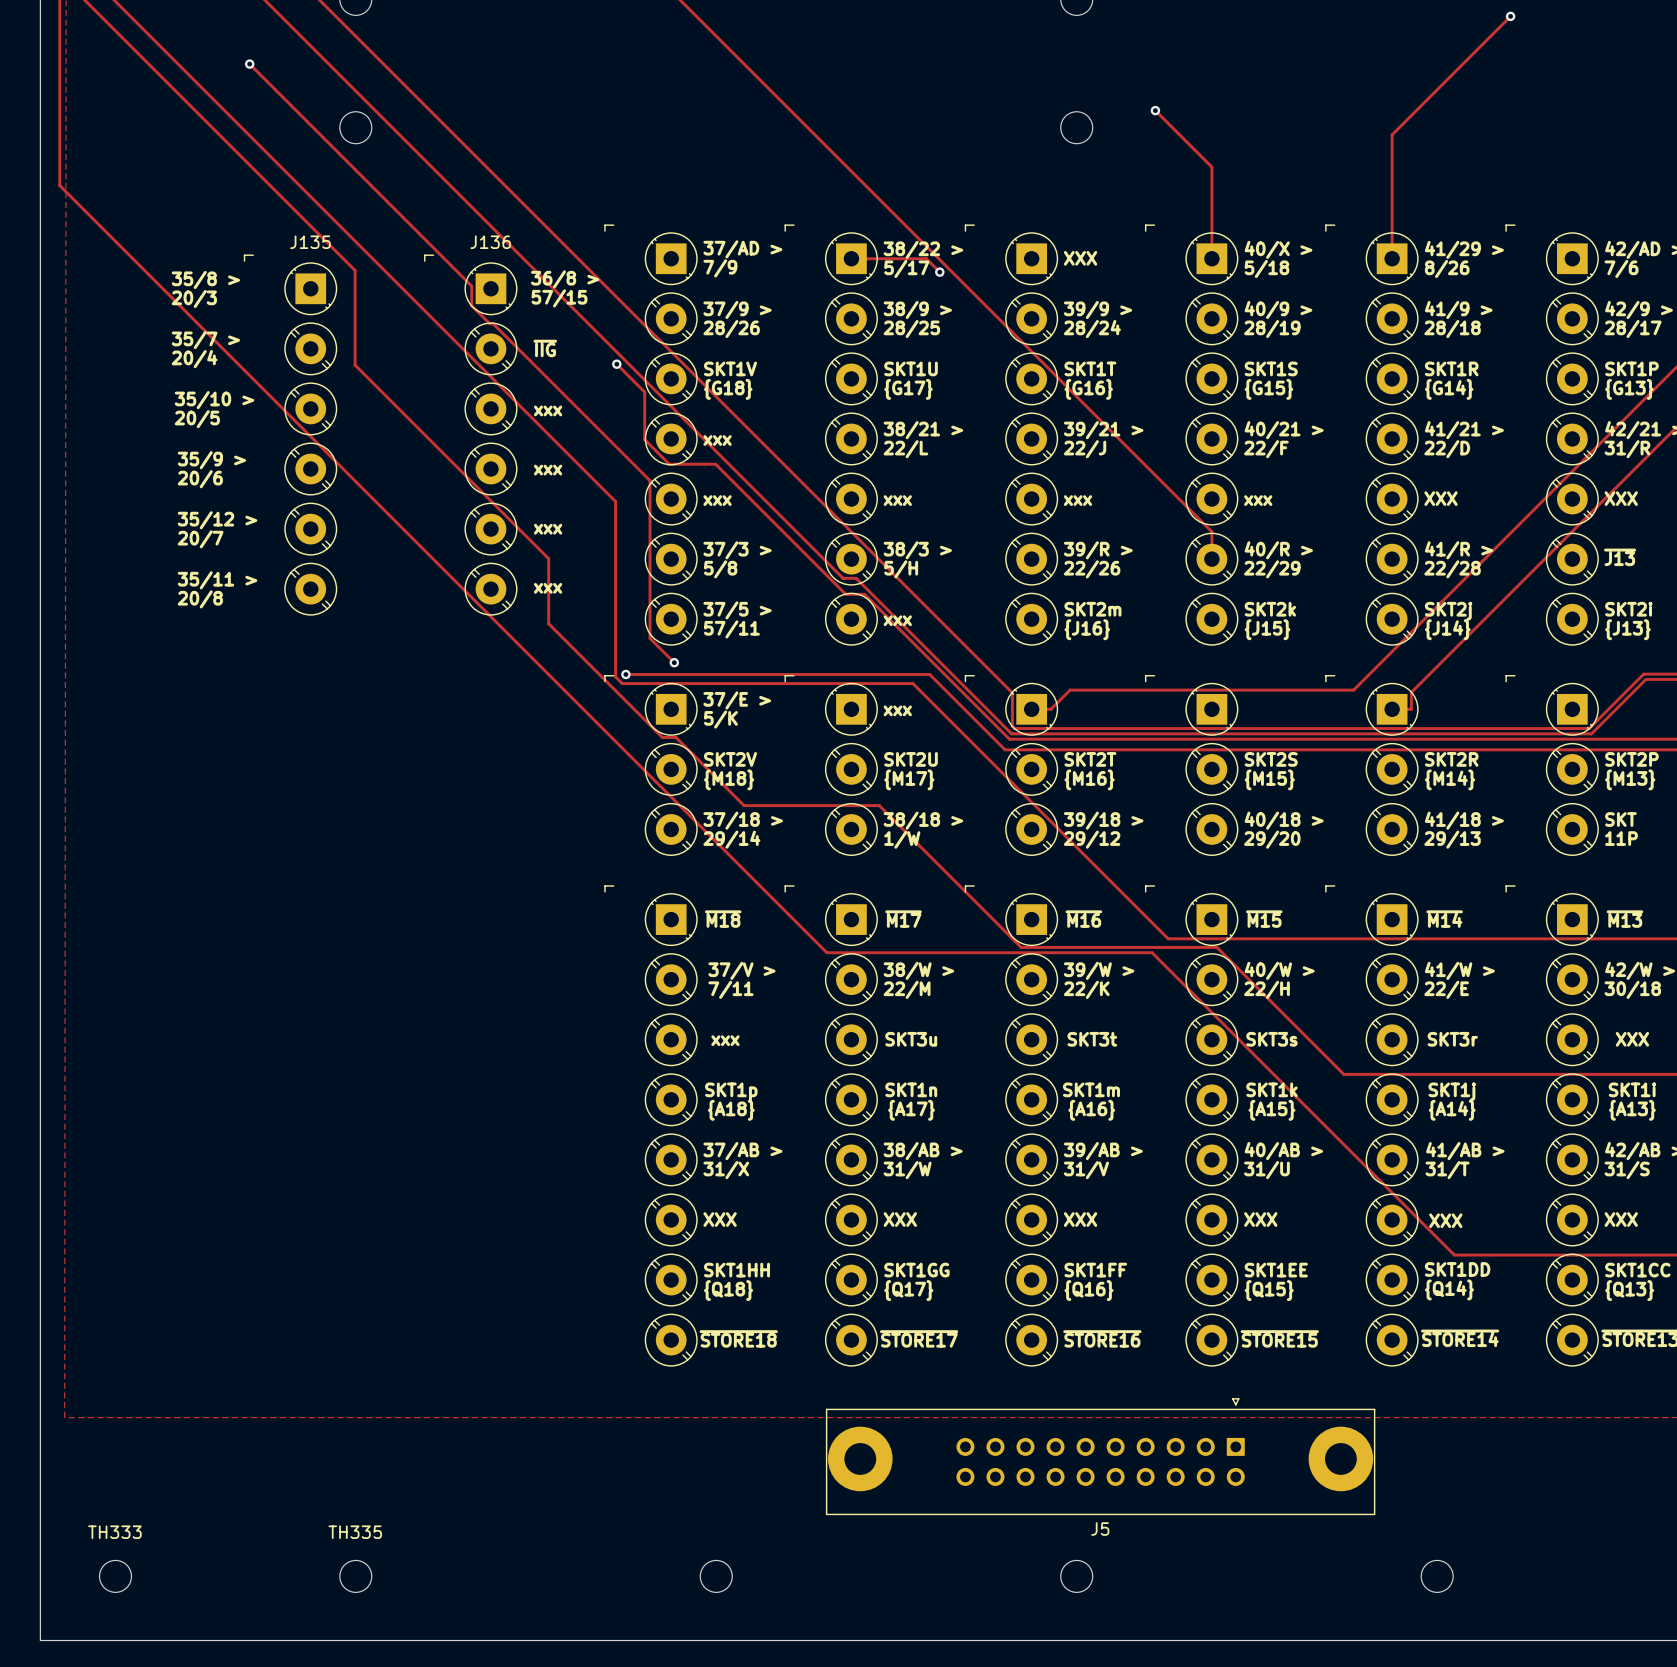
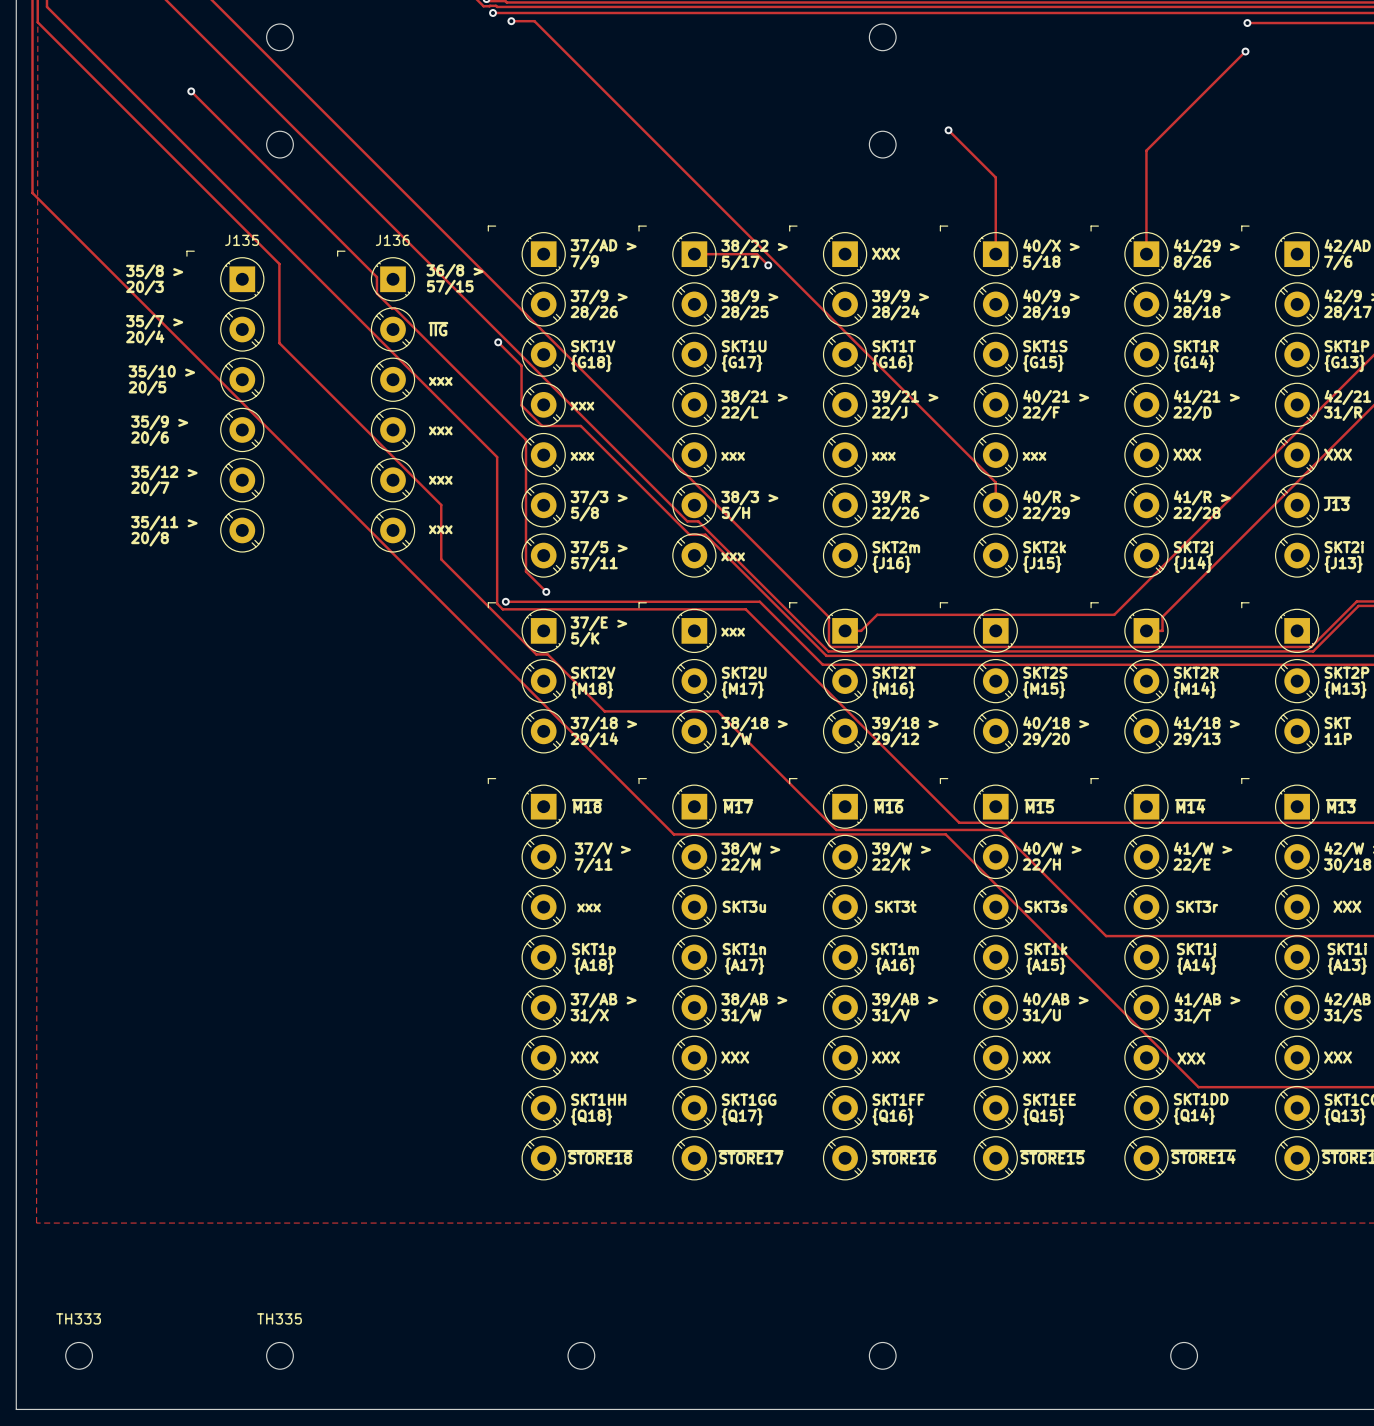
J5: (1100, 1456) -> none

